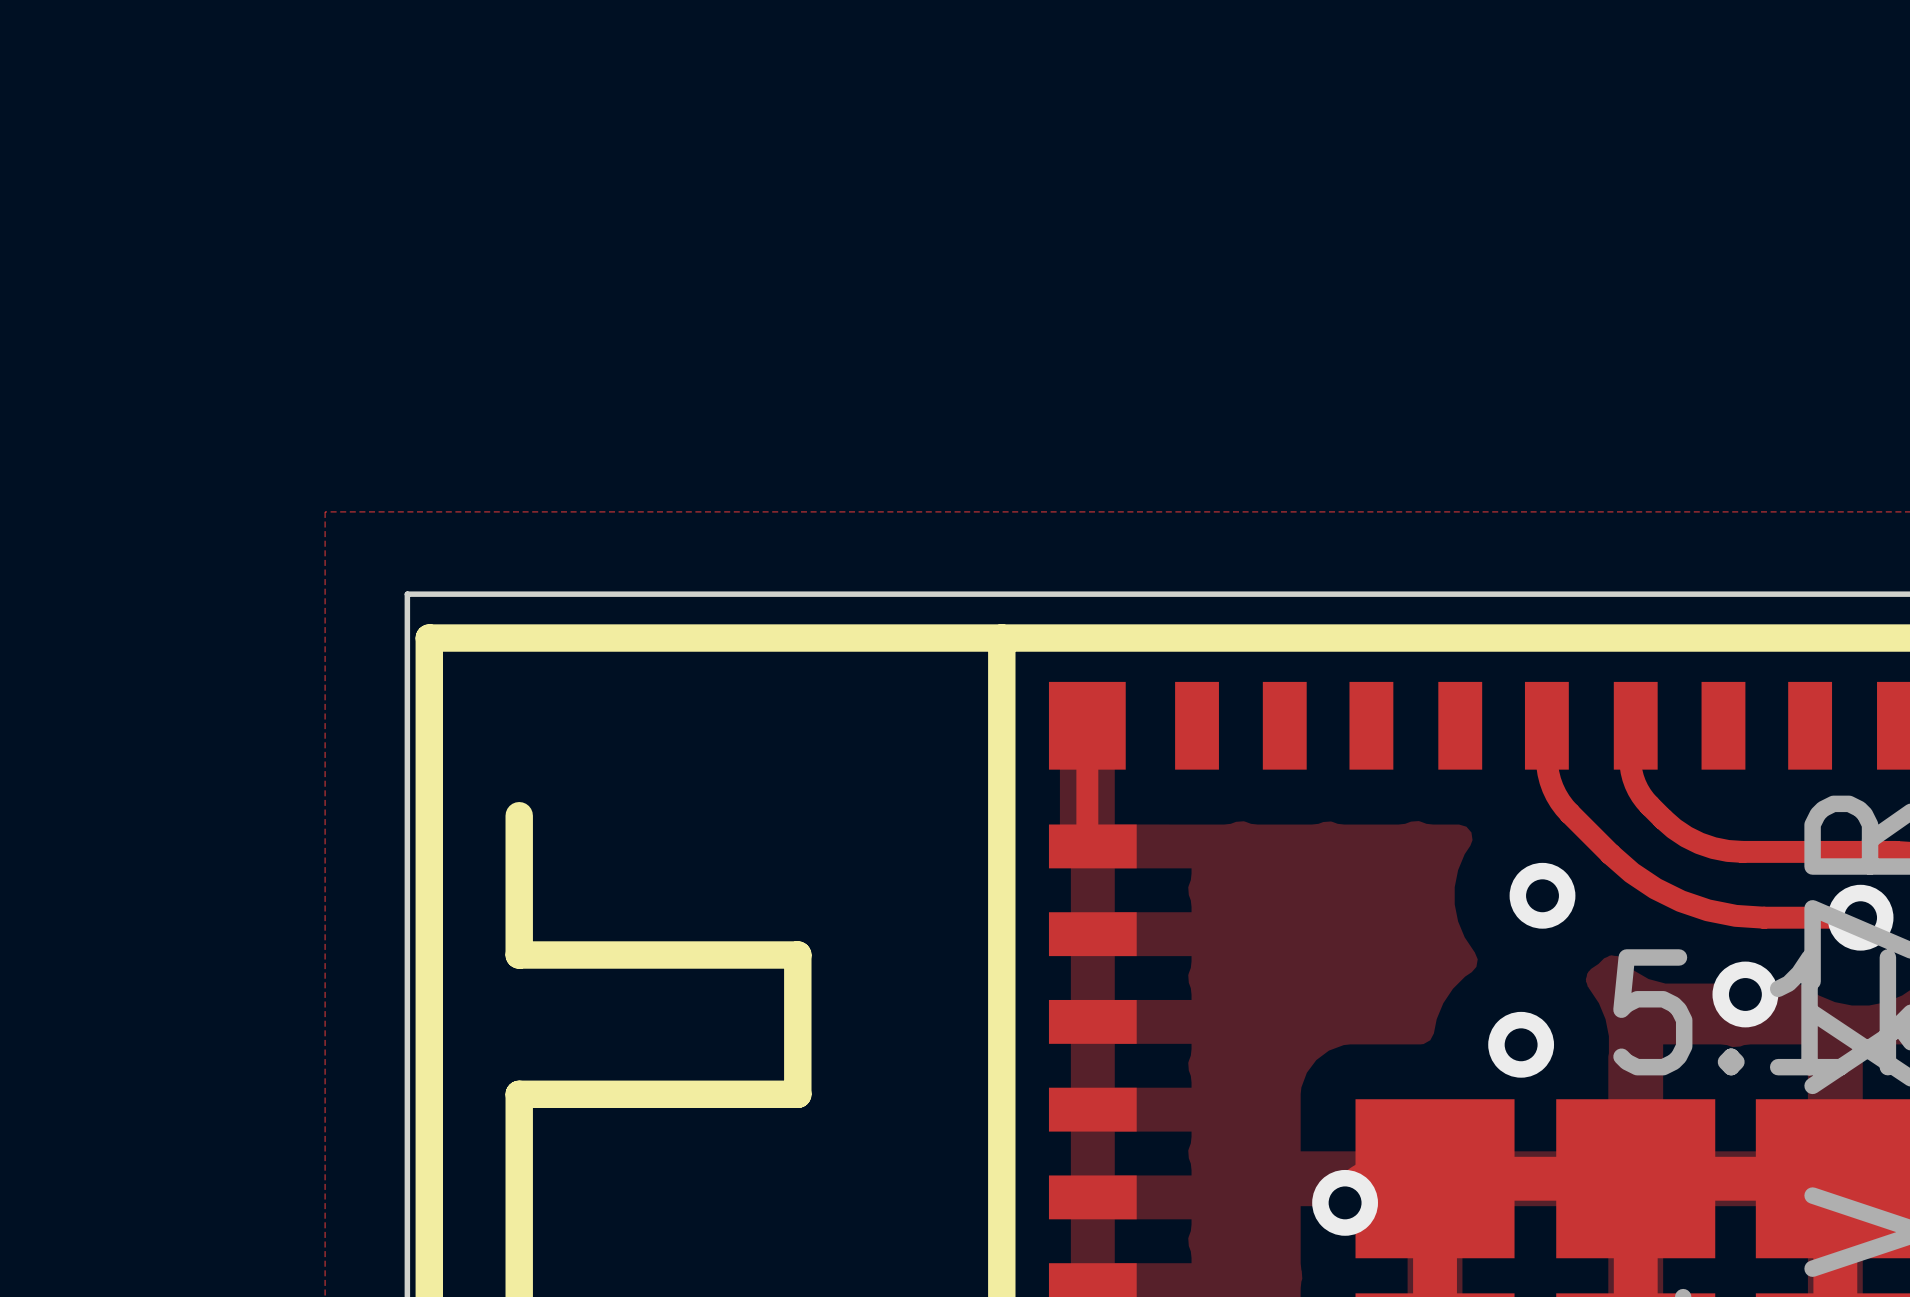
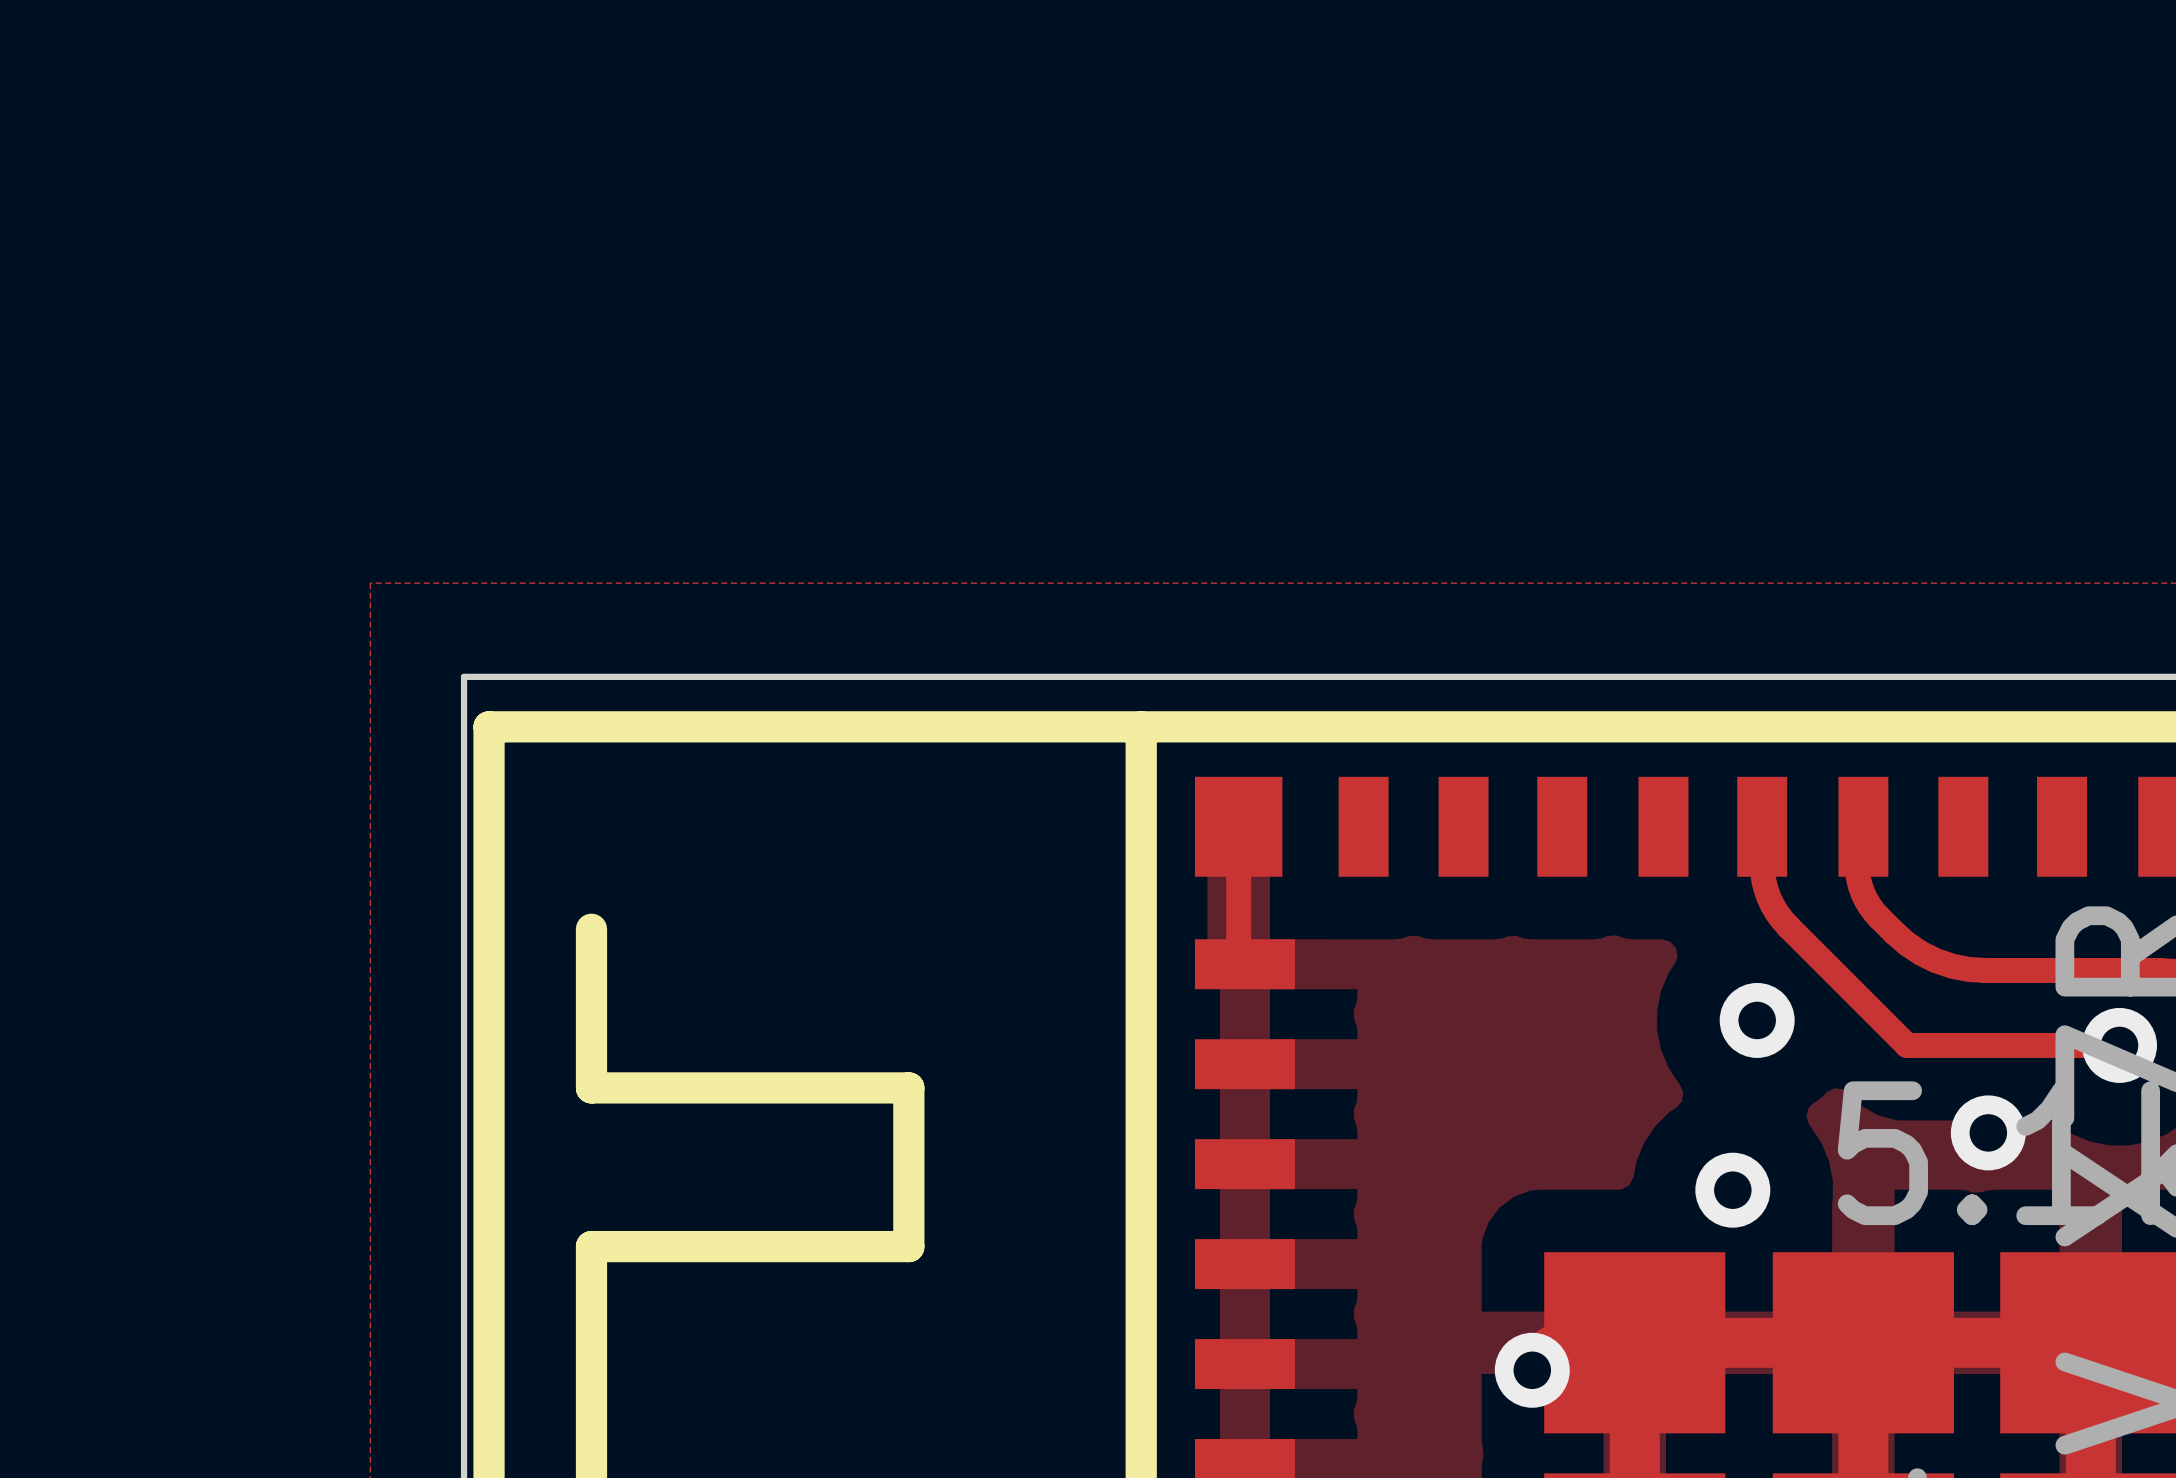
track: (1610, 854) (1631, 872) (1655, 888) (1680, 901) (1707, 910) (1735, 915) (1764, 917) -> (1834, 972) (1907, 1045) (2009, 1045)

